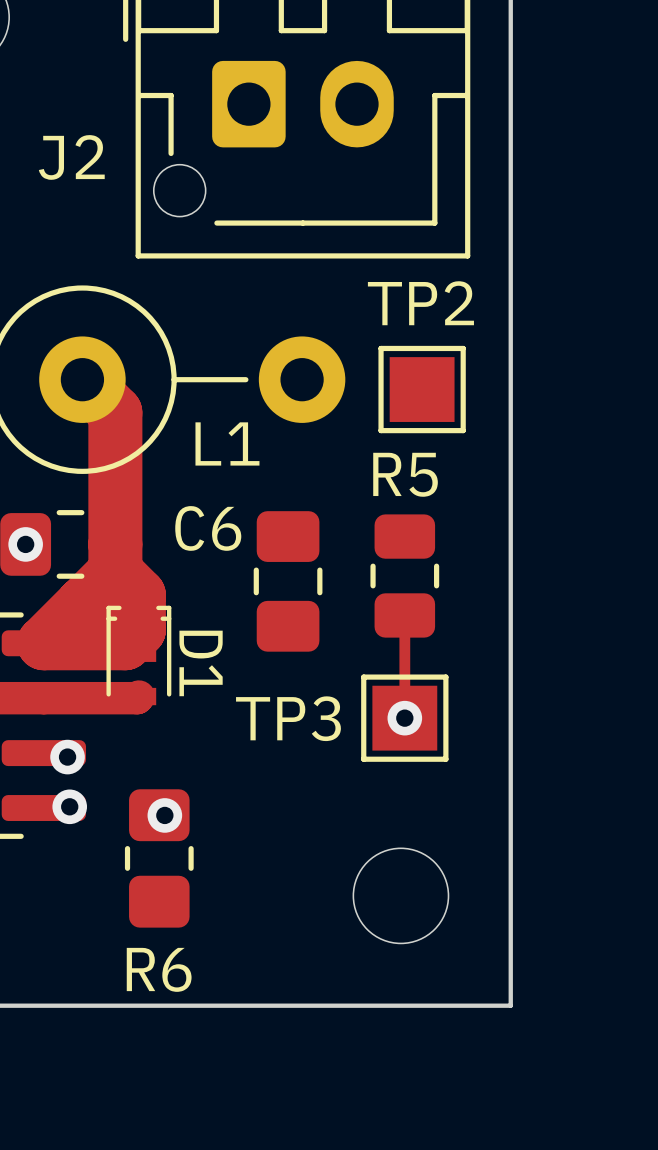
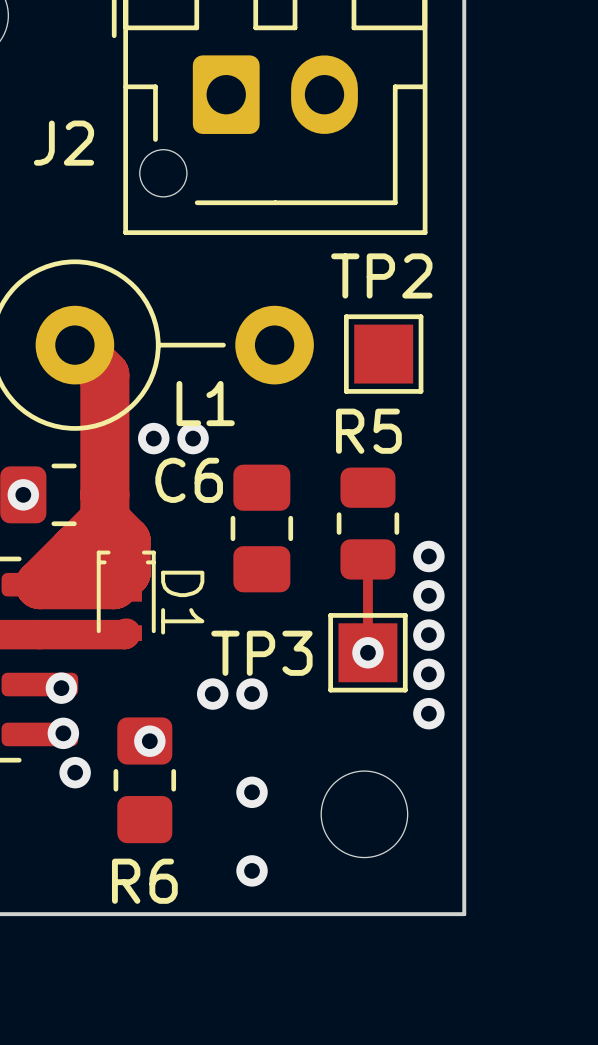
via: none -> (153, 438)
via: none -> (193, 438)
via: none -> (428, 556)
via: none -> (428, 595)
via: none -> (428, 635)
via: none -> (428, 674)
via: none -> (212, 694)
via: none -> (252, 694)
via: none -> (428, 713)
via: none -> (75, 772)
via: none -> (252, 792)
via: none -> (252, 870)

